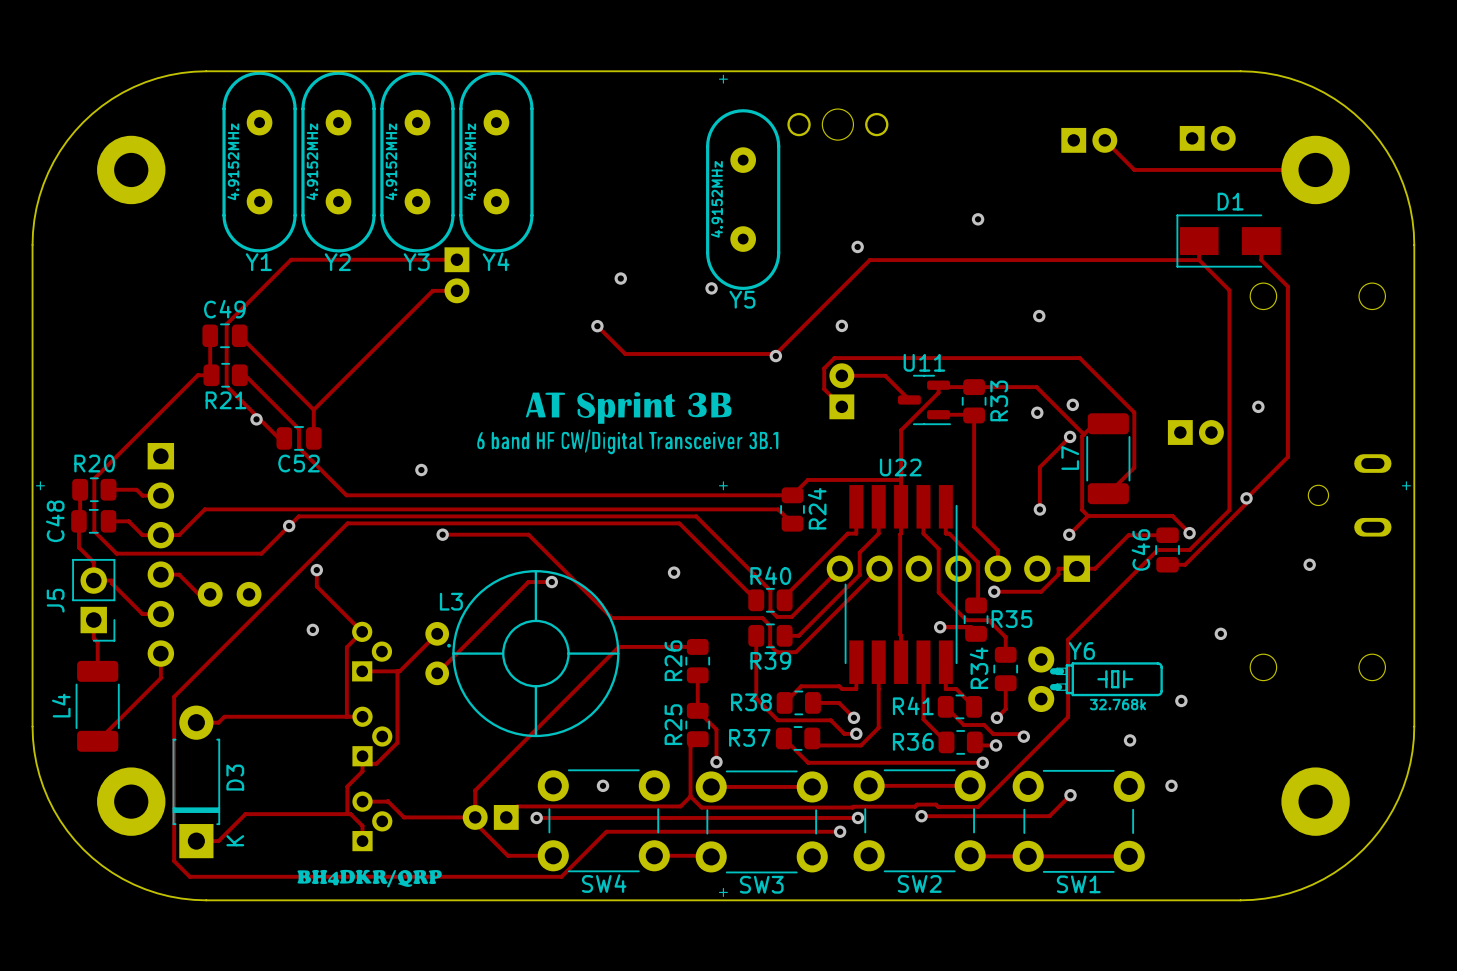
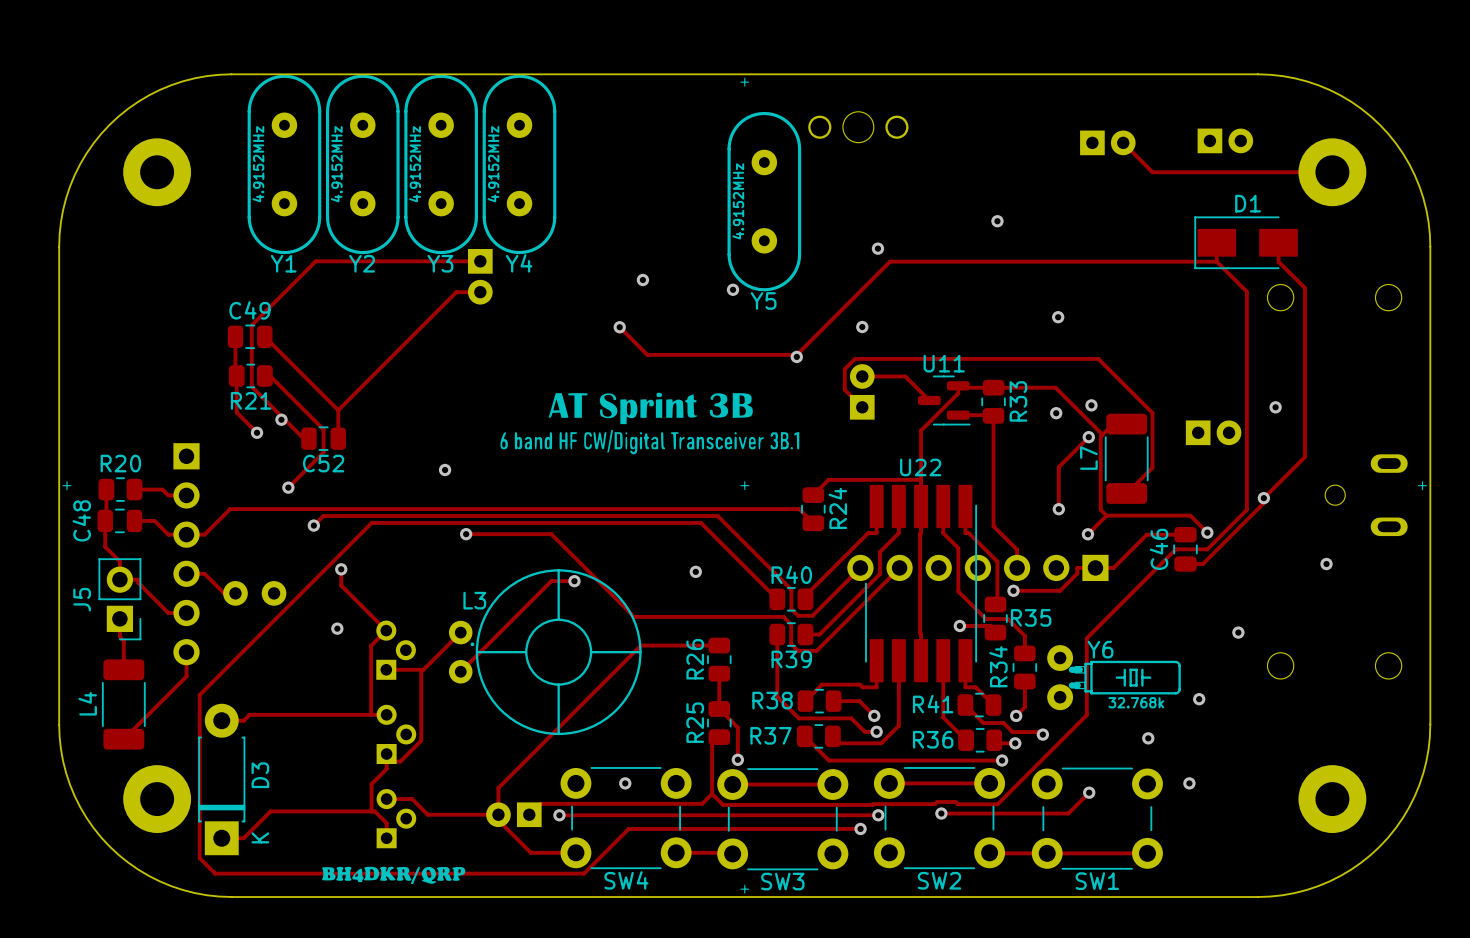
track: (210, 375) (197, 375) (94, 478) (94, 531) (116, 553) (261, 553) (289, 526) -> none
track: none -> (236, 375) (236, 412) (257, 432)
via: none -> (257, 432)
track: (299, 447) (346, 495) (792, 495) -> (323, 448) (323, 452) (288, 487)
via: none -> (288, 487)

